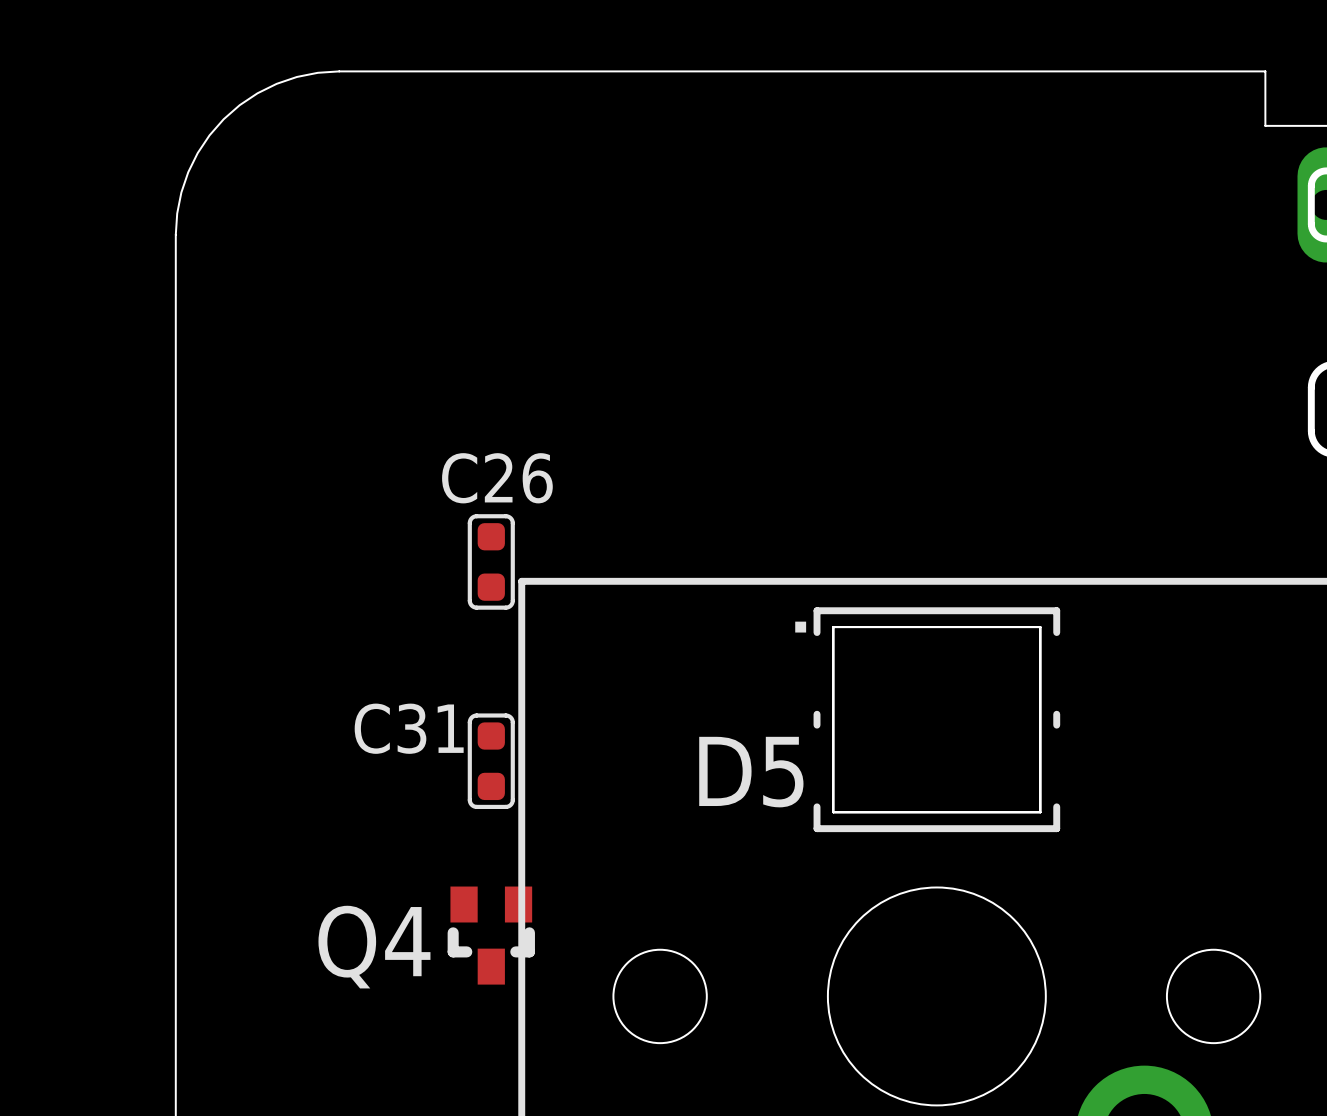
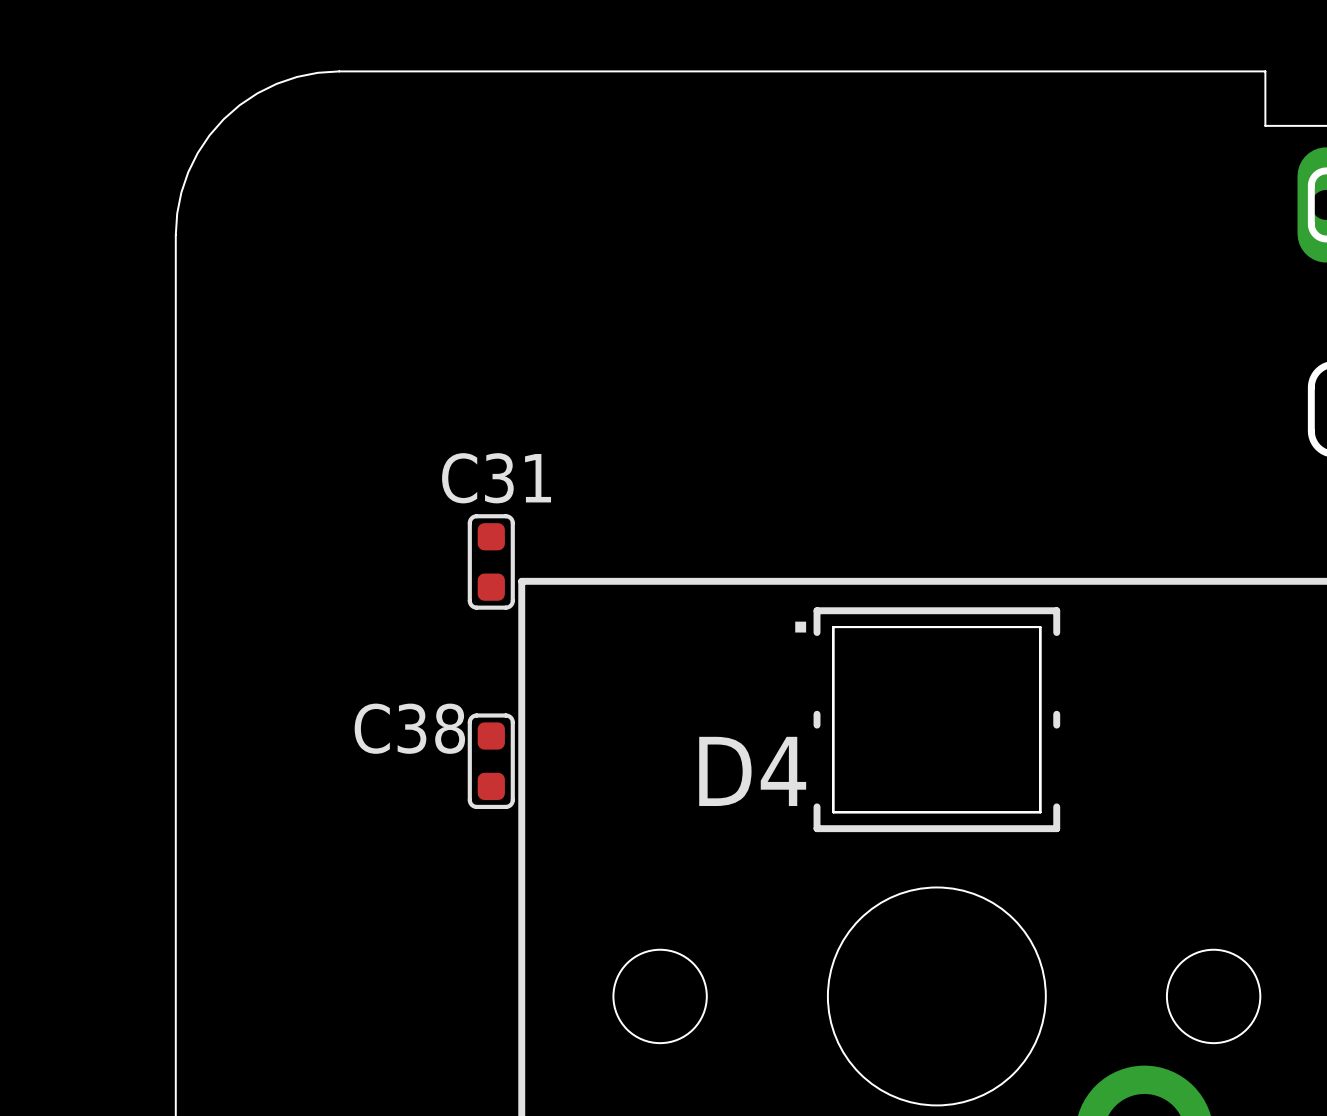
C26 name: C26 (497, 478) -> C31 (496, 478)
C31 name: C31 (409, 728) -> C38 (409, 728)
D5 name: D5 (751, 772) -> D4 (752, 771)
Q4: (491, 935) -> none

